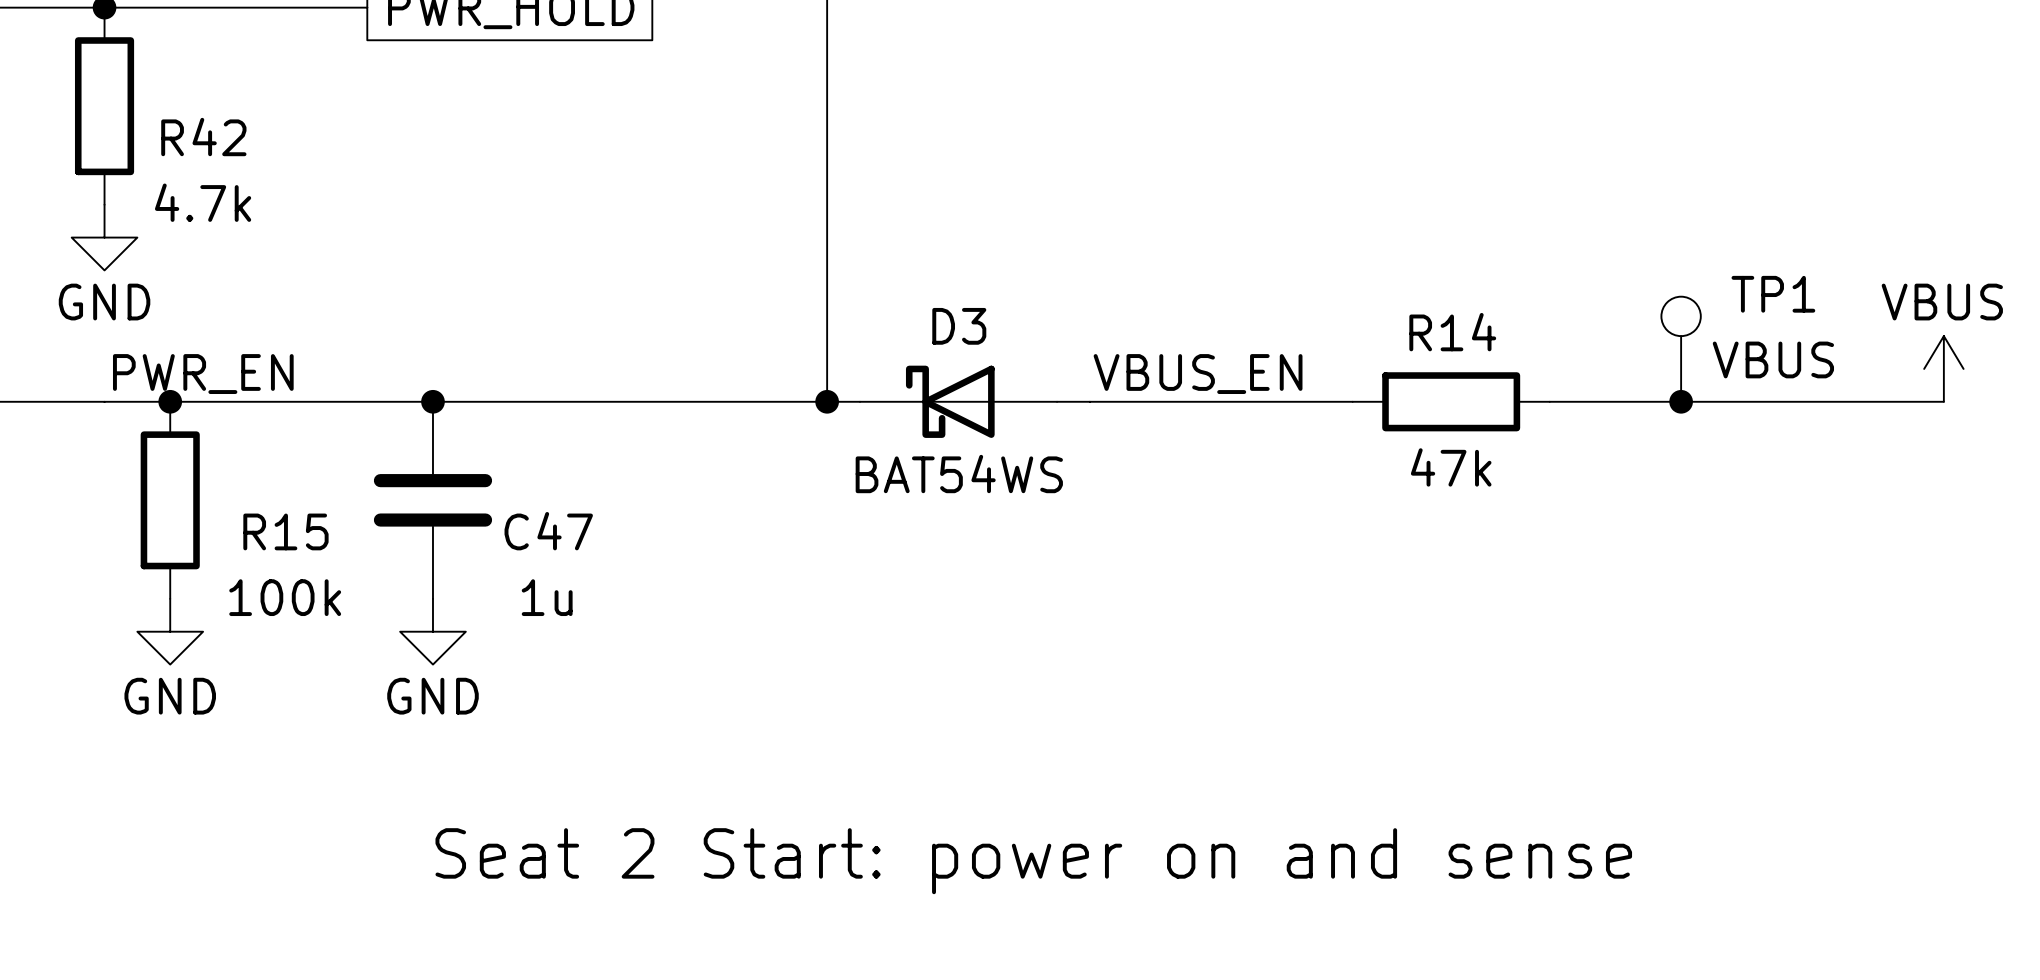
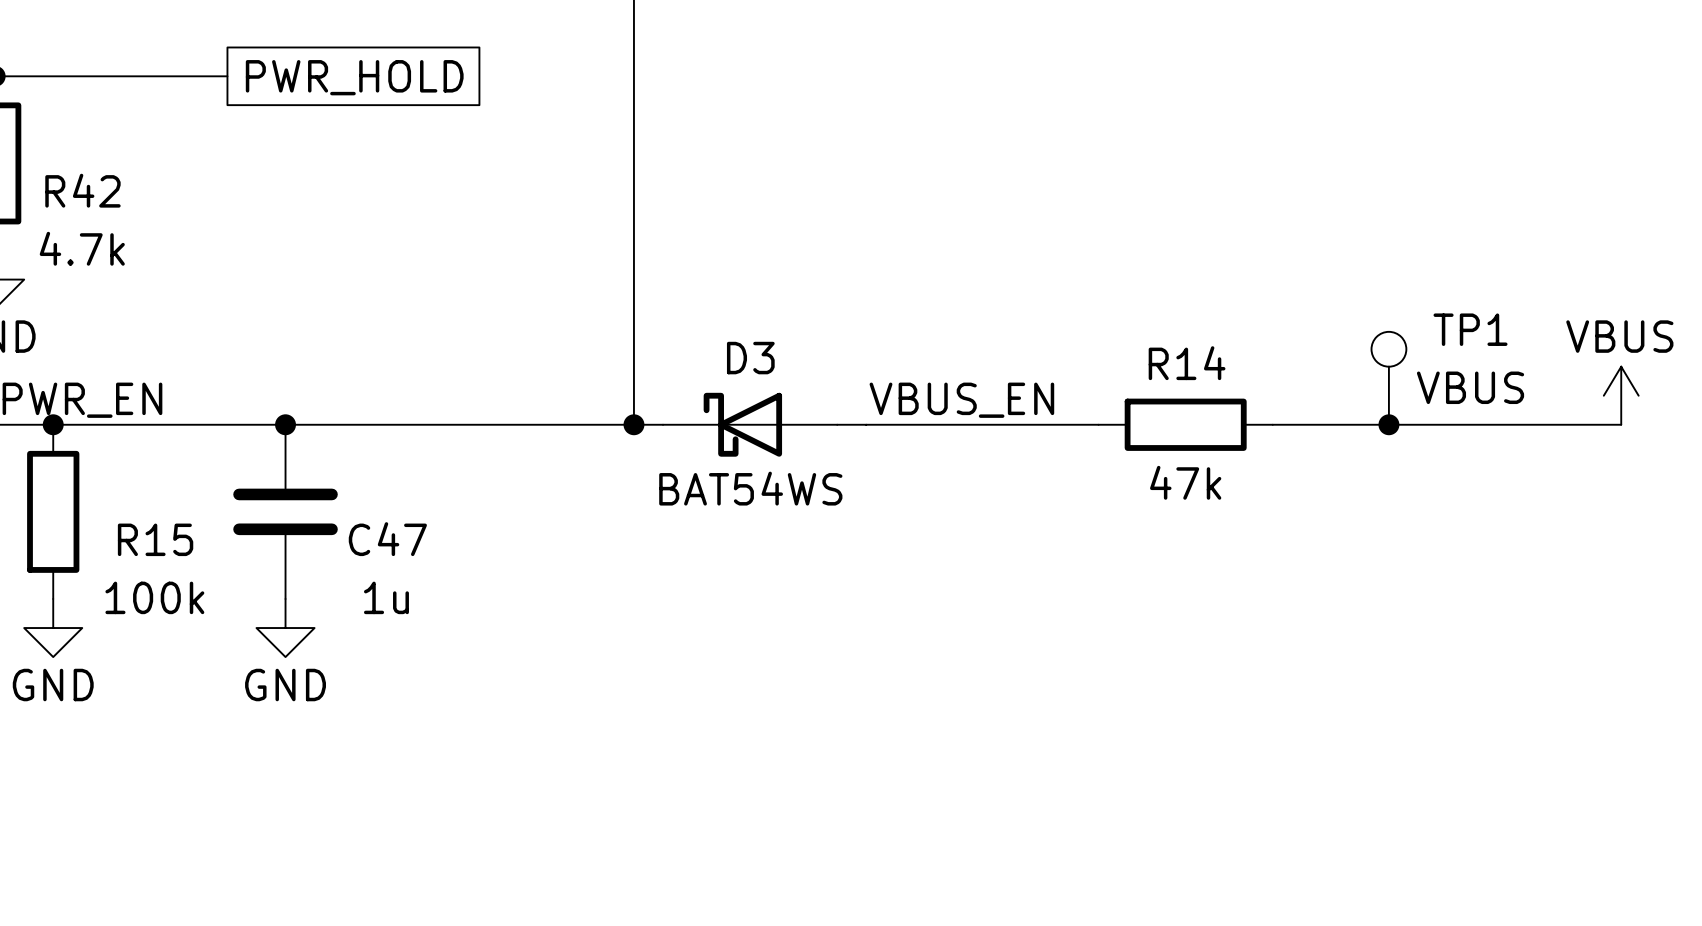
text: Seat 2 Start: power on and sense (1033, 861) -> none

